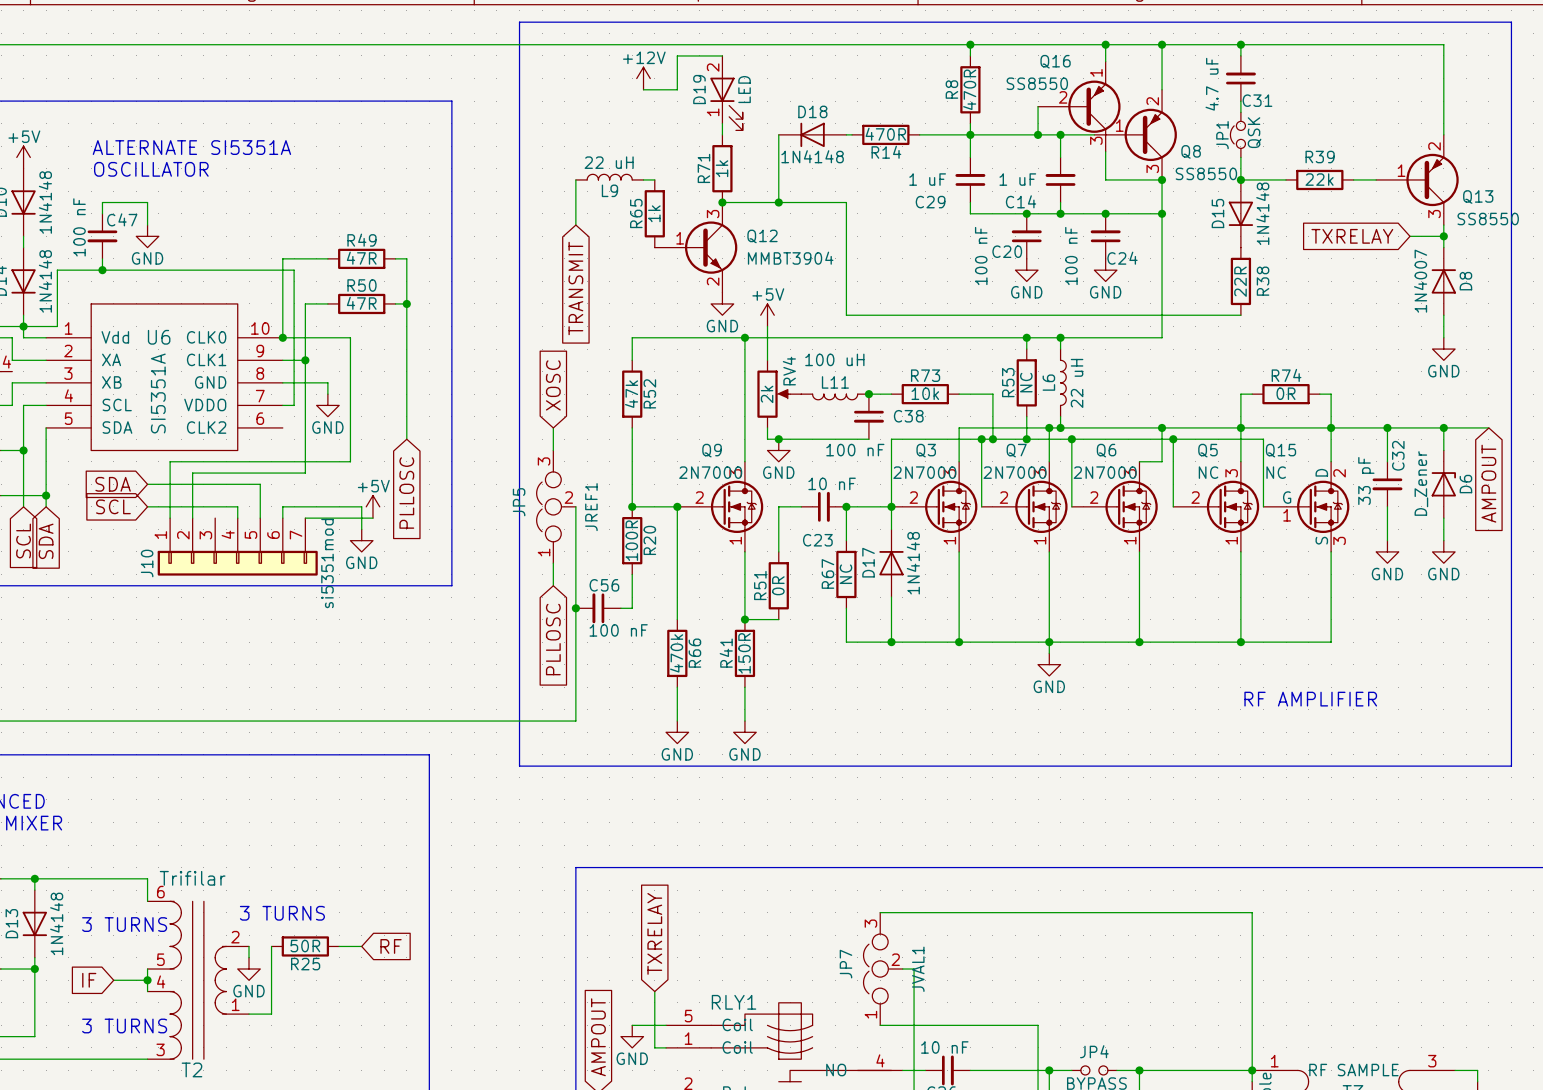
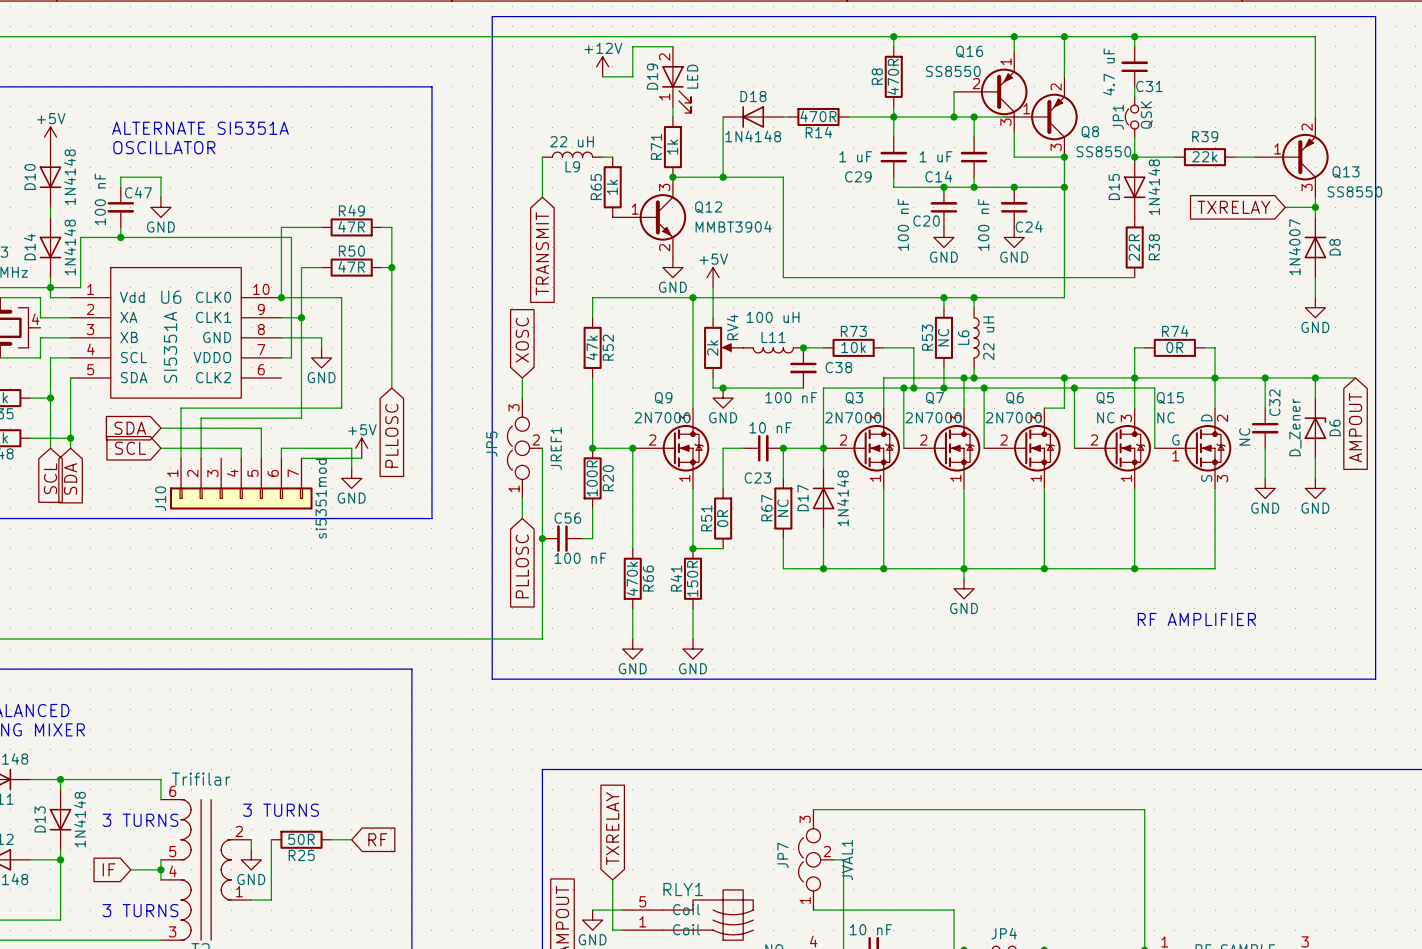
C32 value: 33 pF (1366, 481) -> NC (1244, 436)

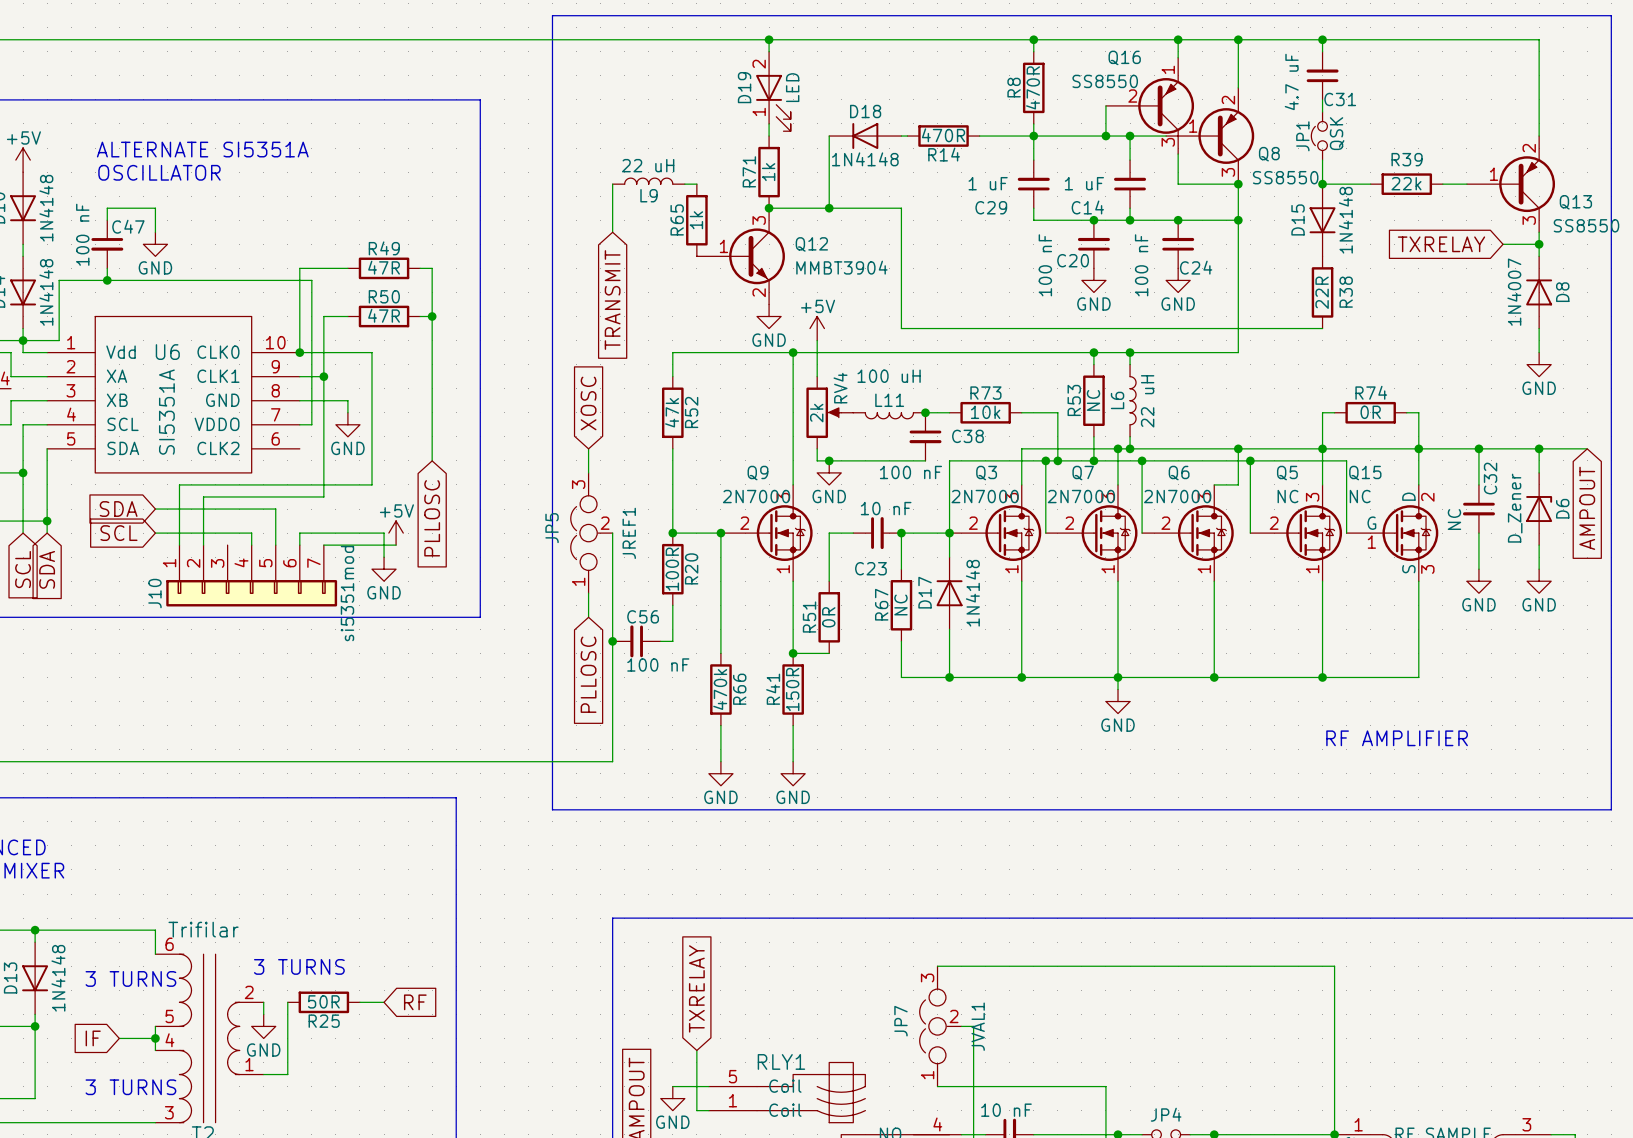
junction: none -> (769, 39)
wire: (672, 46) (632, 46) (632, 76) (602, 76) -> (769, 51) (769, 39)
power symbol: +12V (602, 66) -> none

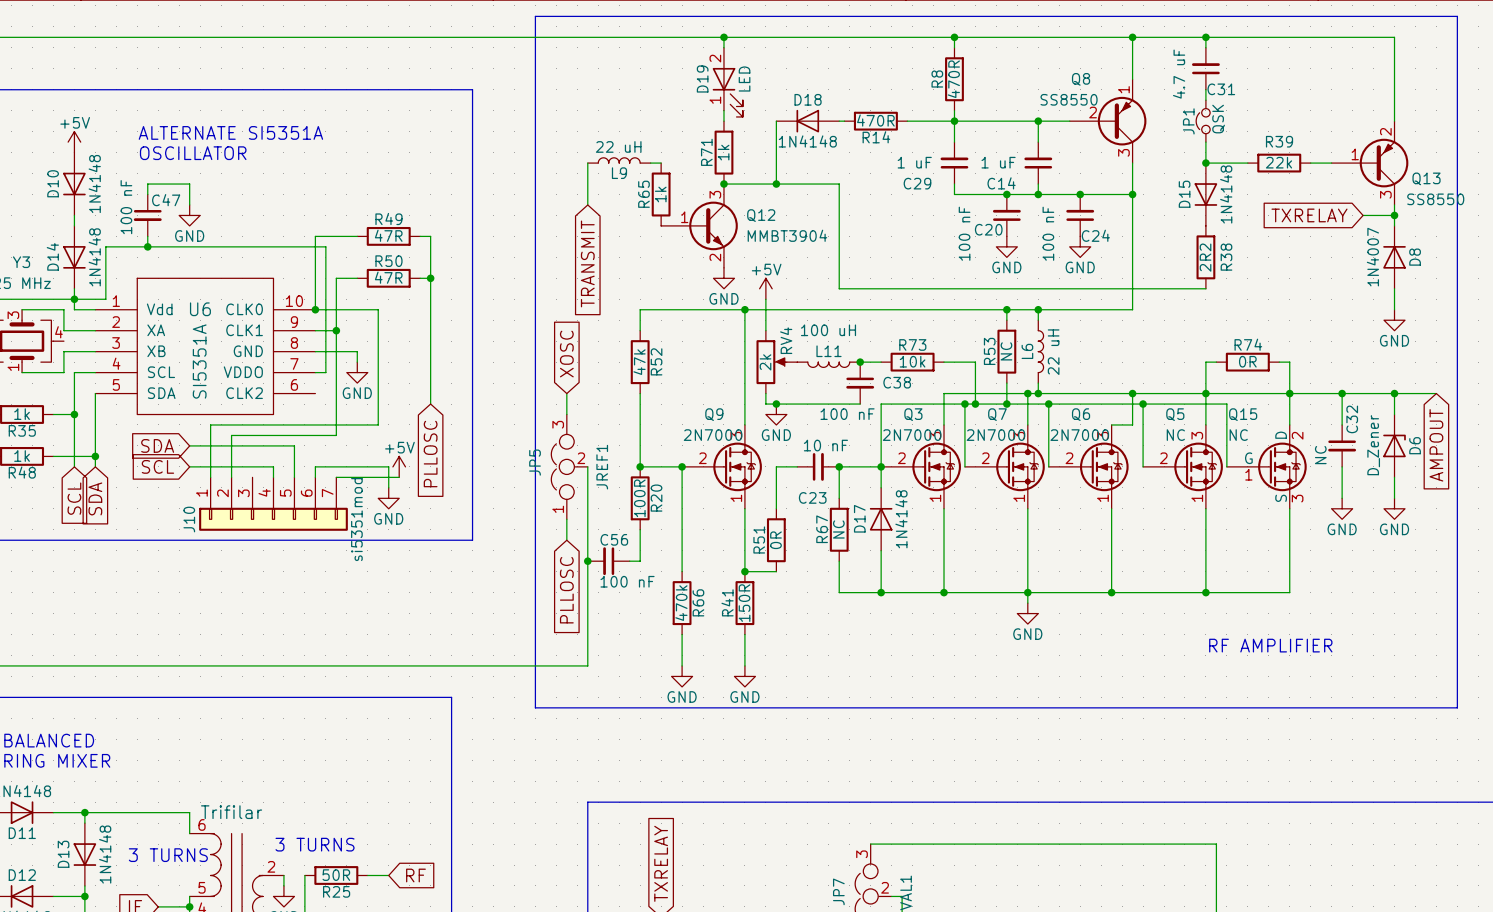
wire: (1178, 39) (1178, 57) -> none
junction: (1178, 39) -> none
Q8 pin number: 2 (1228, 100) -> 1 (1123, 89)
wire: (1105, 105) (1105, 136) -> none
Q16: SS8550 (1150, 105) -> none
Q8 pin number: 1 (1193, 126) -> 2 (1093, 112)
junction: (1105, 136) -> none
wire: (1178, 154) (1178, 184) (1238, 184) -> none
Q8 name position: Q8 (1269, 154) -> Q8 (1081, 79)
Q8 value position: SS8550 (1285, 177) -> SS8550 (1069, 99)
junction: (1238, 184) -> none
R38 value: 22R (1322, 292) -> 2R2 (1205, 257)

